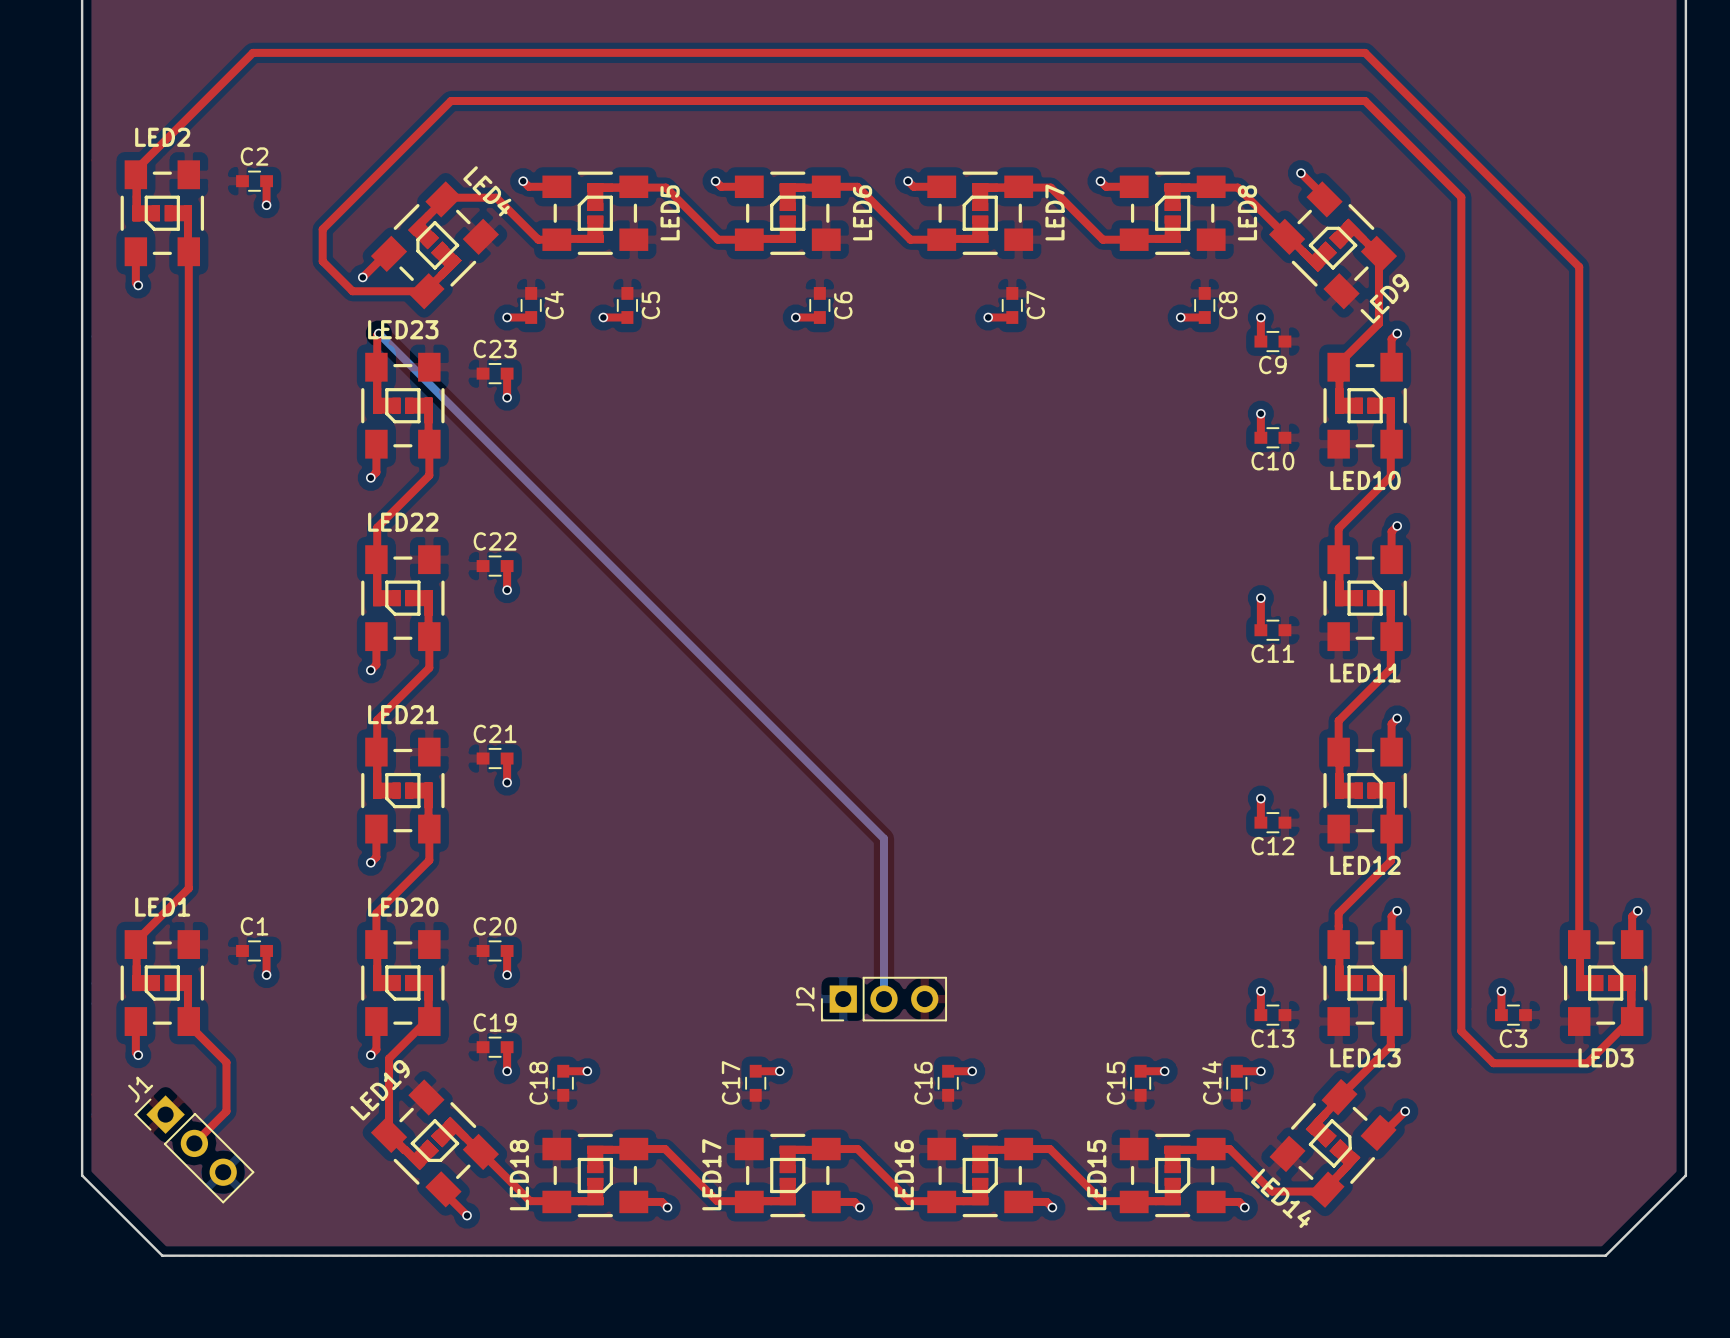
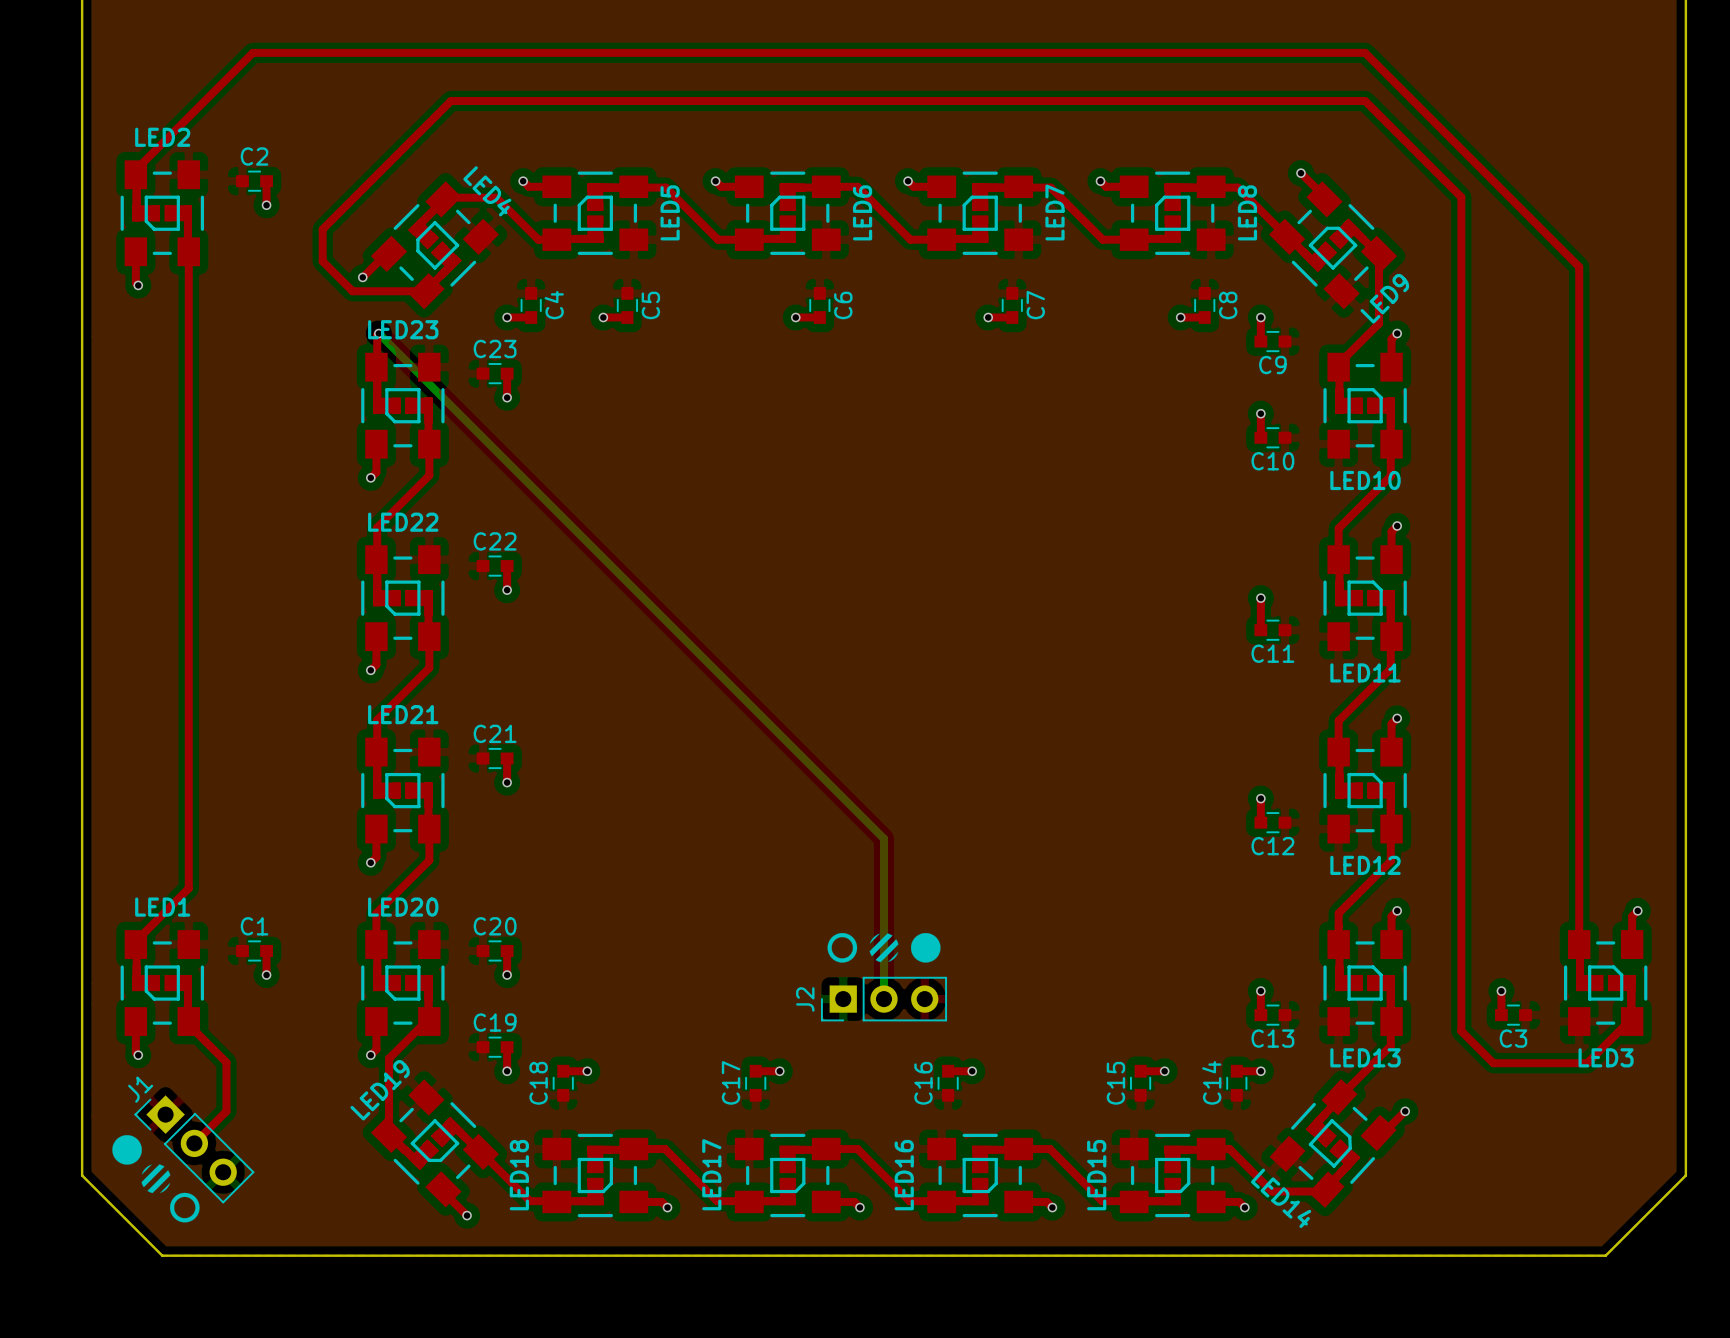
drawing: none -> [827, 933, 941, 963]
drawing: none -> [112, 1135, 200, 1223]

